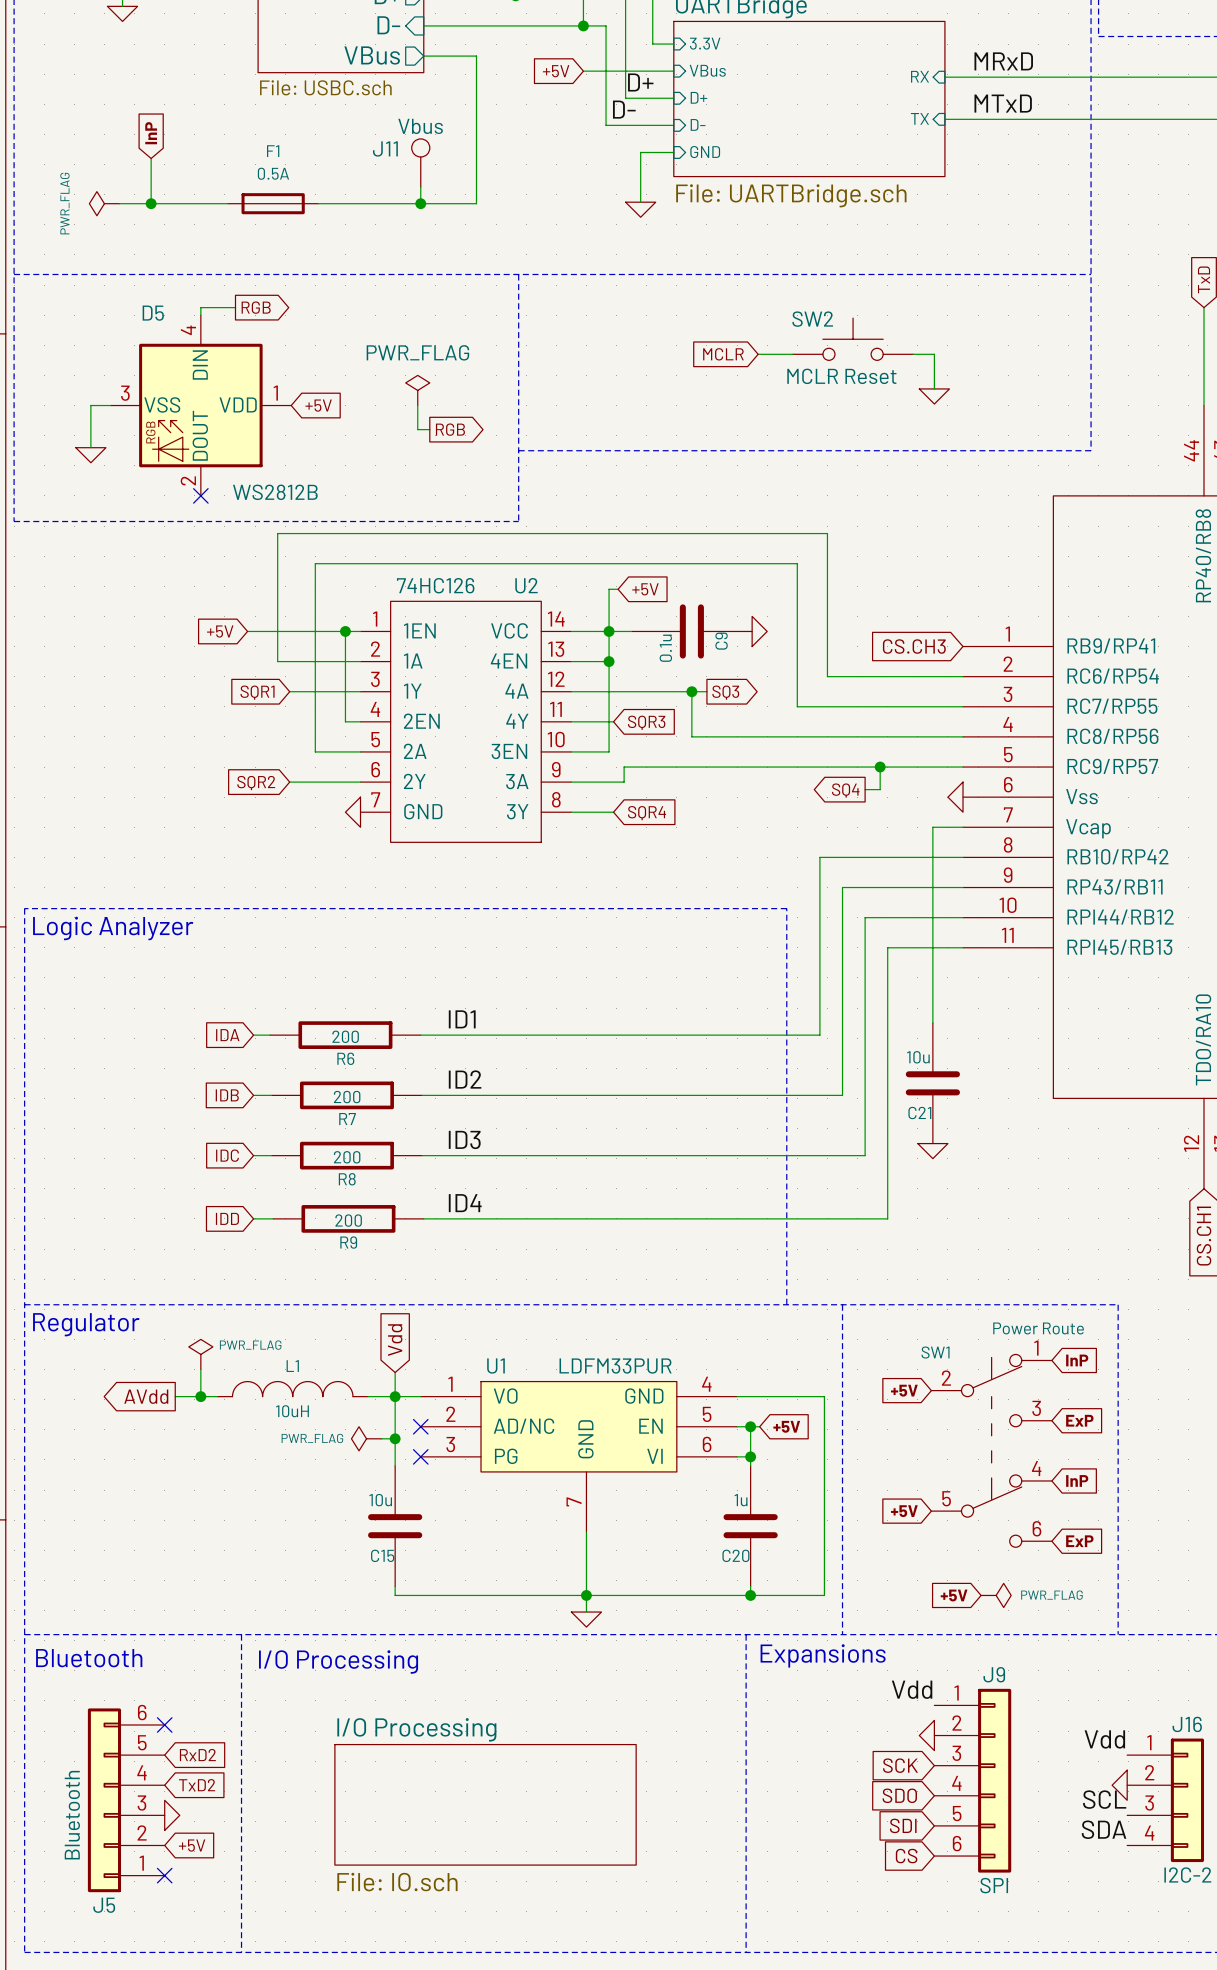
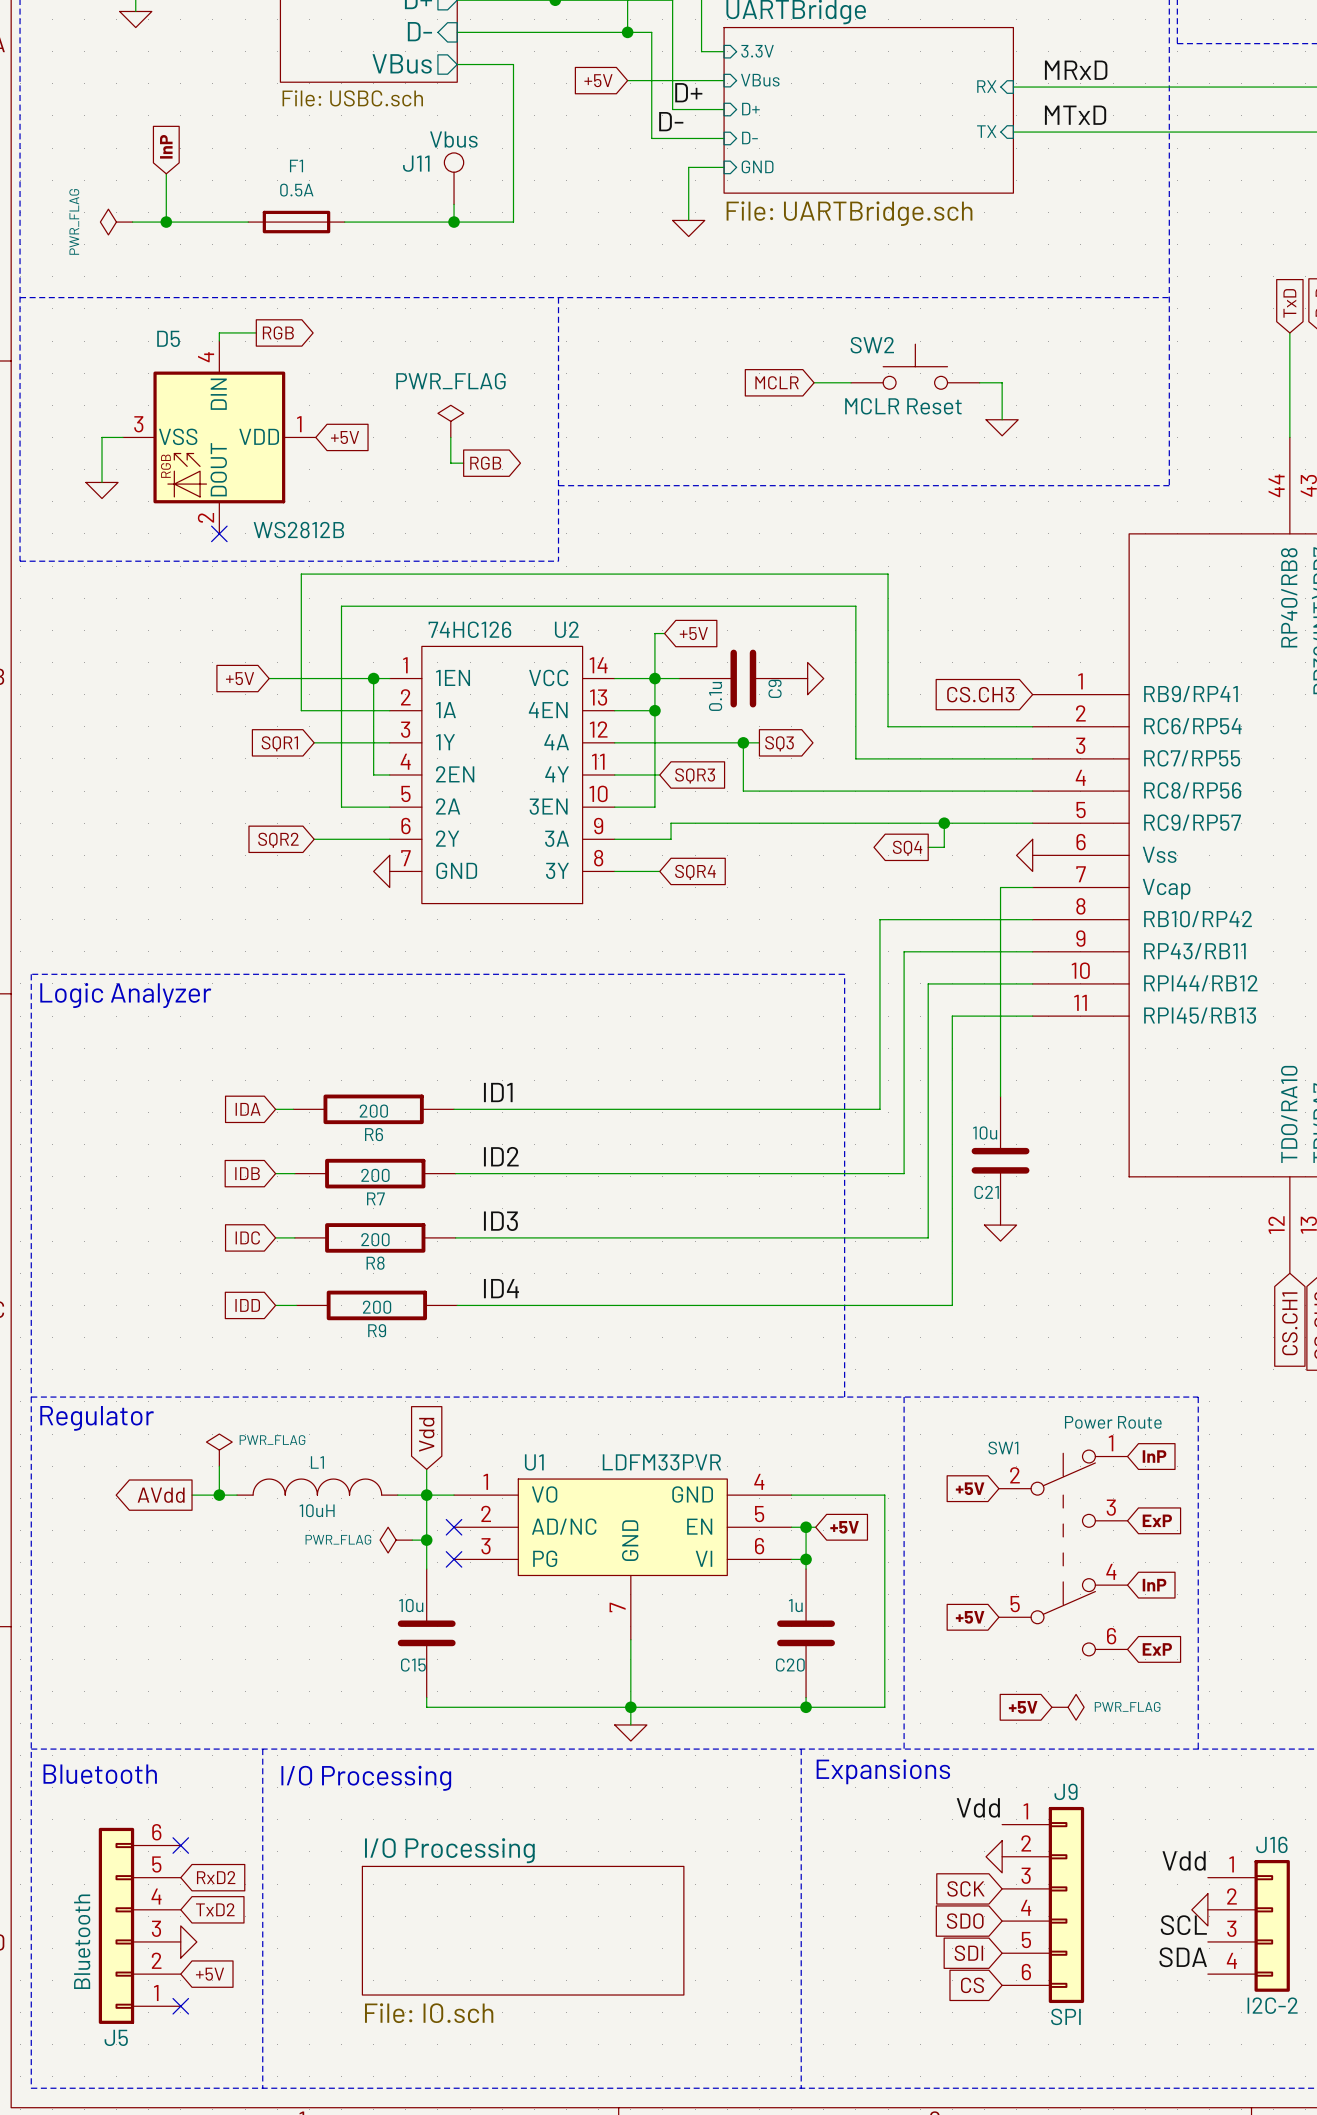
U1 value: LDFM33PUR (615, 1366) -> LDFM33PVR (661, 1462)

